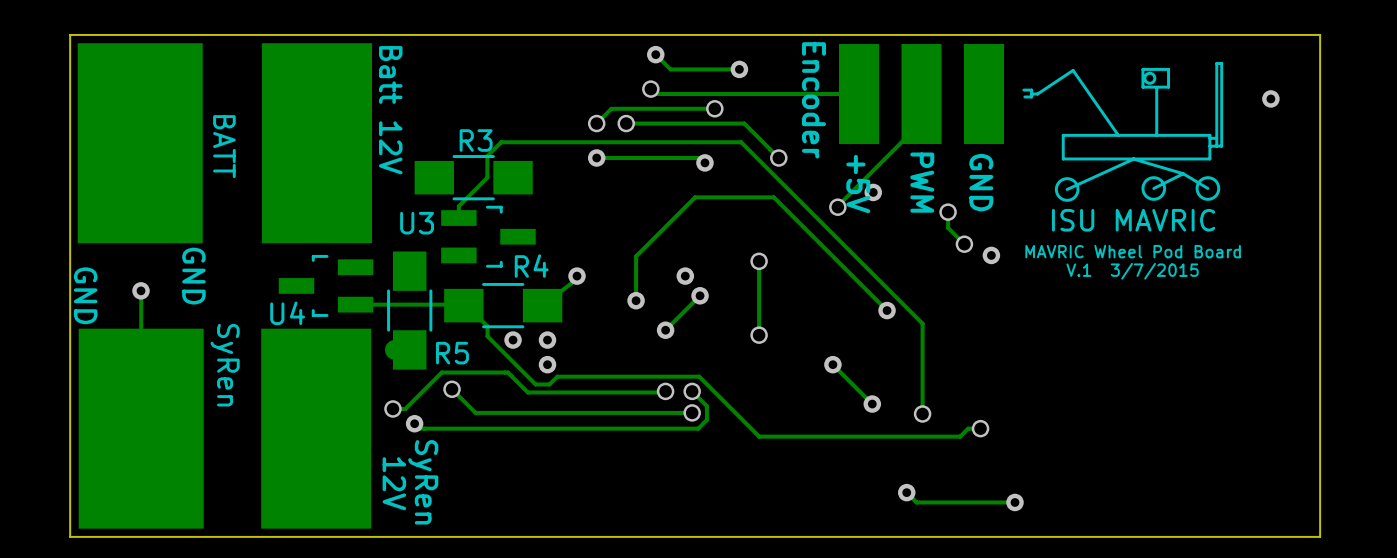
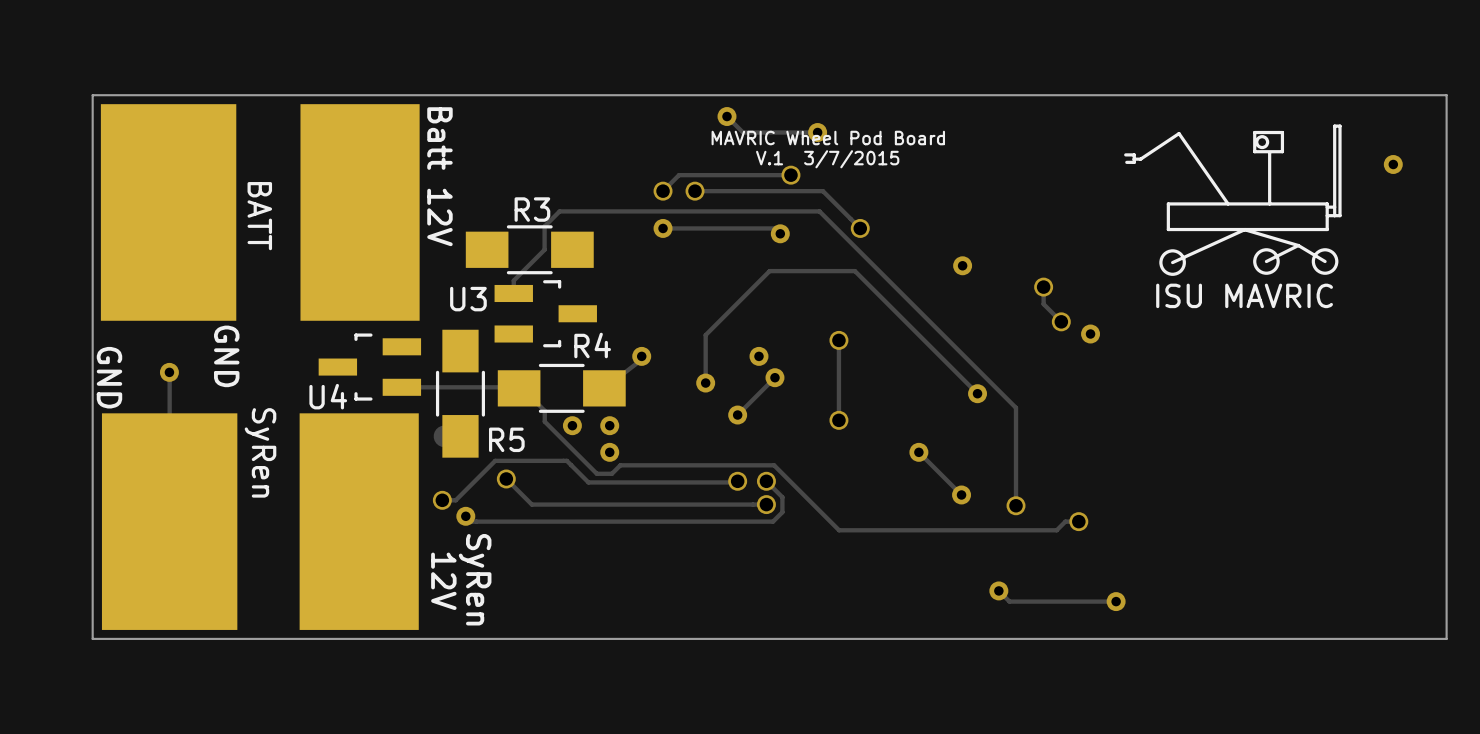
track: (650, 89) (655, 94) (859, 94) -> none
via: (650, 89) -> none
track: (921, 94) (921, 122) (837, 207) -> none
part: (921, 94) -> none
text: Encoder (813, 100) -> none
text: PWM (922, 182) -> none
text: GND (981, 182) -> none
text: +5V (858, 184) -> none
via: (837, 207) -> none
text position: MAVRIC Wheel Pod Board (1133, 251) -> MAVRIC Wheel Pod Board (828, 138)
text position: V.1 3/7/2015 (1132, 271) -> V.1 3/7/2015 (827, 159)

